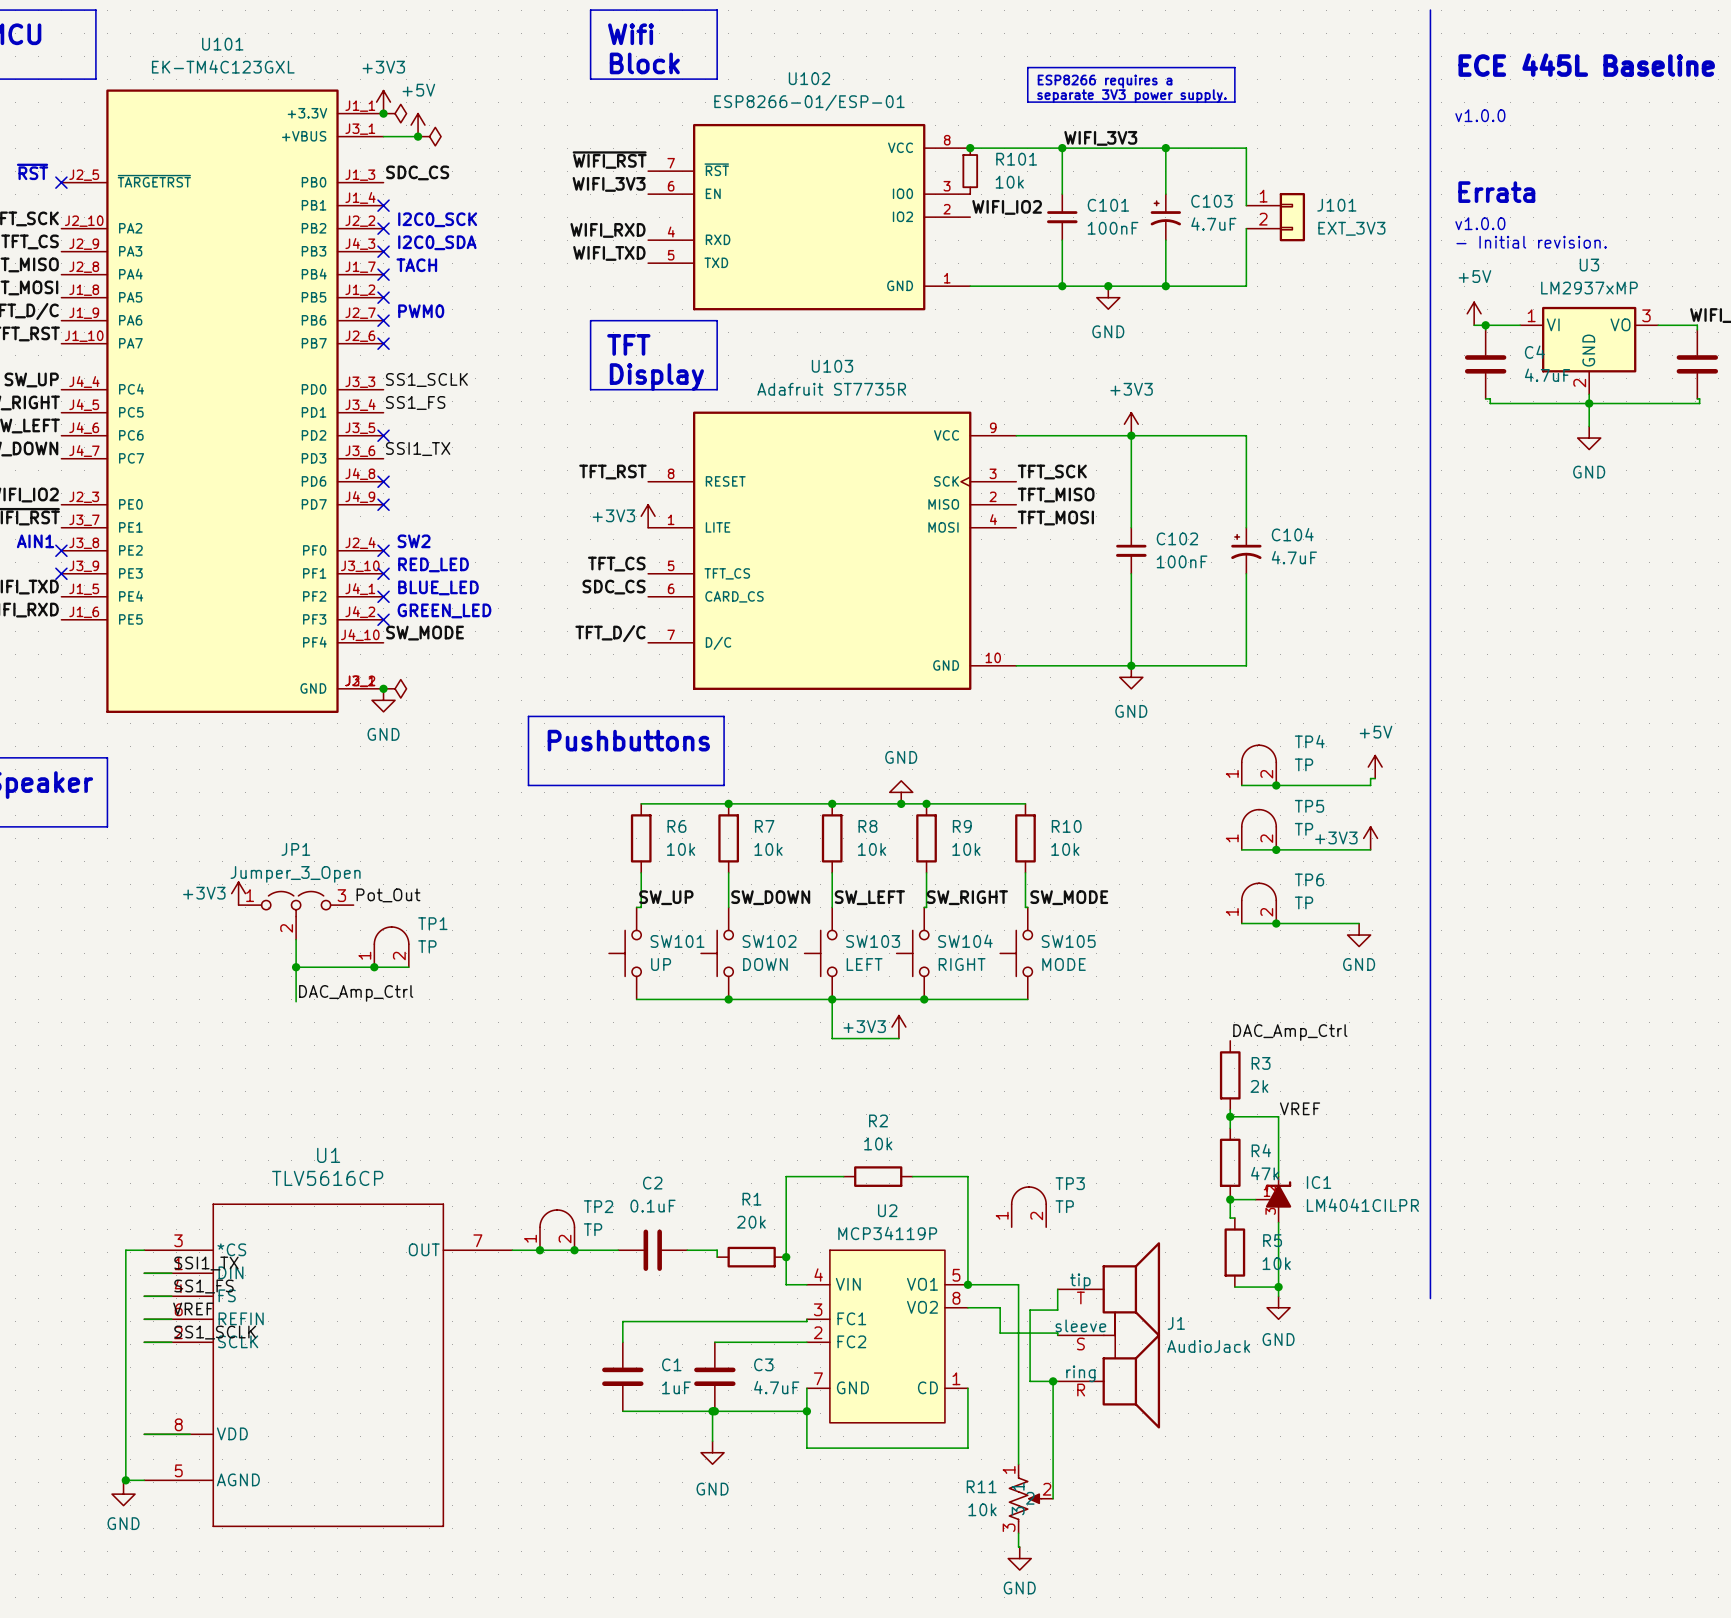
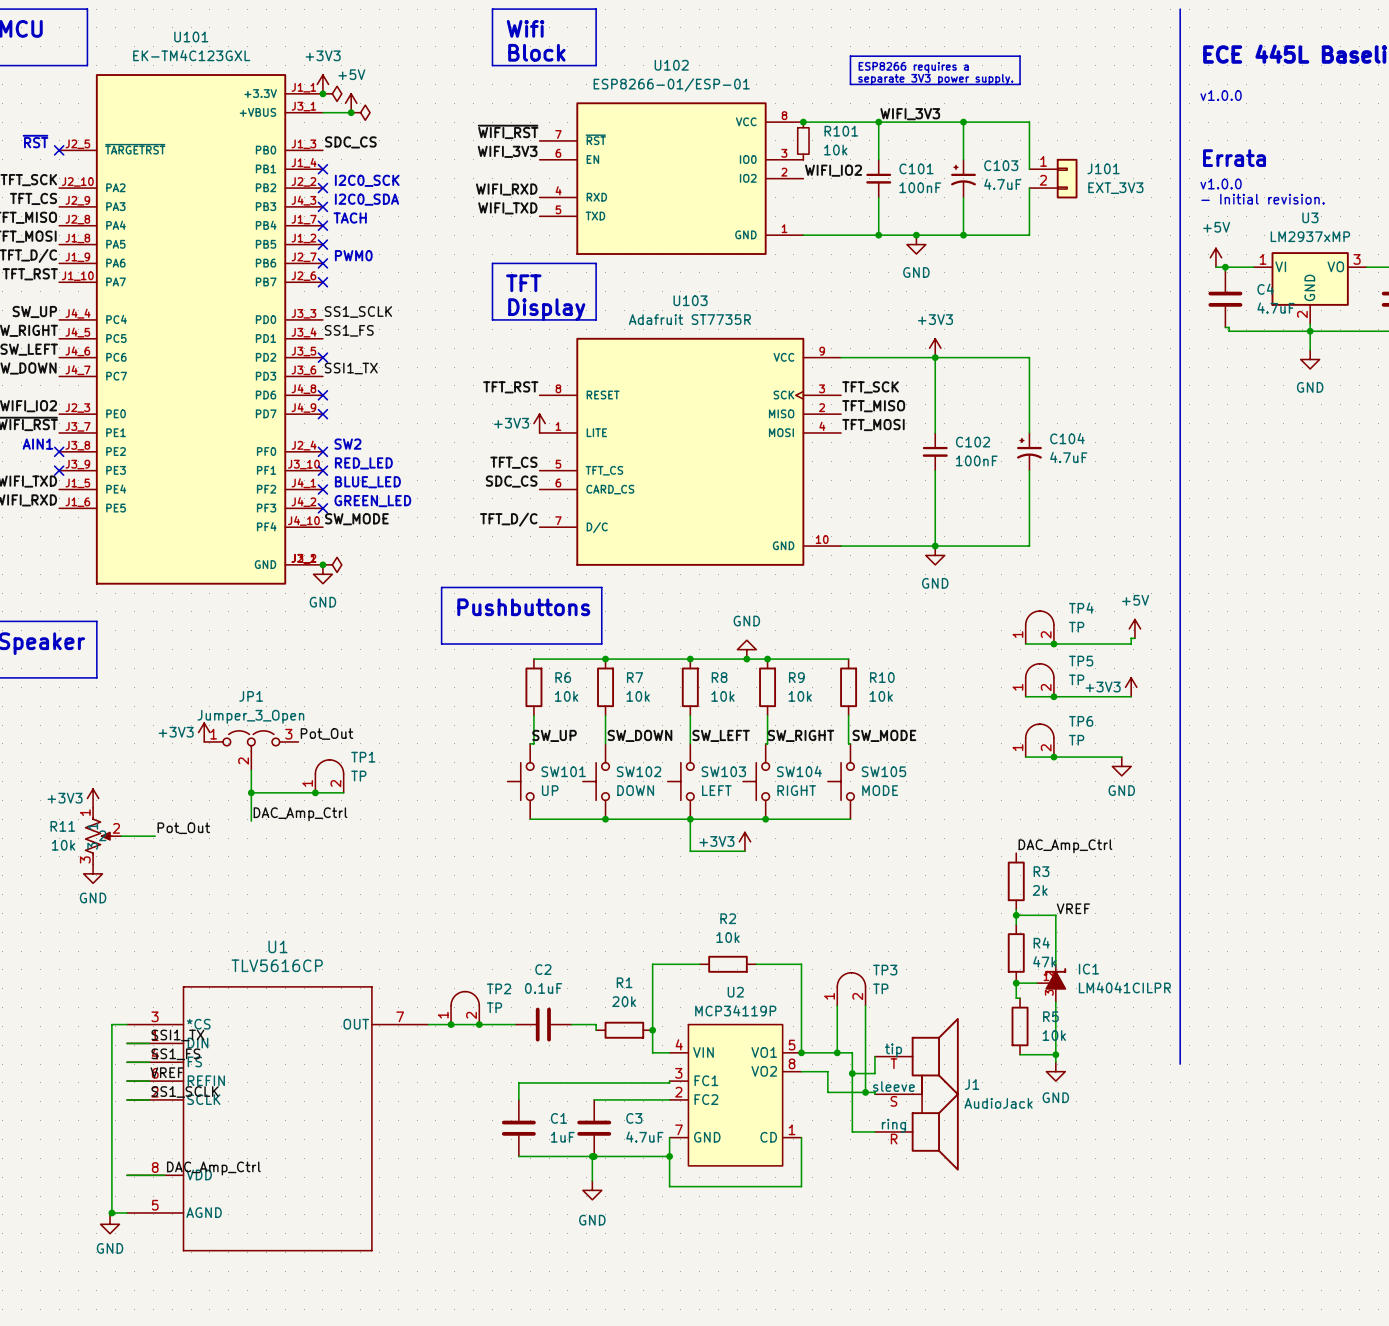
power symbol: none -> +3V3 (93, 798)
label: none -> Pot_Out (183, 828)
wire: none -> (121, 836) (155, 836)
power symbol: none -> GND (93, 873)
wire: none -> (837, 1005) (837, 1052)
wire: none -> (865, 1005) (865, 1092)
junction: none -> (837, 1052)
wire: (1018, 1284) (1018, 1464) -> (842, 1052) (852, 1052) (852, 1073)
junction: none -> (852, 1073)
junction: none -> (865, 1092)
wire: (1053, 1381) (1053, 1498) -> none
junction: (1053, 1381) -> none
label: none -> DAC_Amp_Ctrl (213, 1168)
R11 position: (1031, 1498) -> (103, 836)
wire: (1018, 1533) (1019, 1547) -> none
power symbol: GND (1019, 1558) -> none

